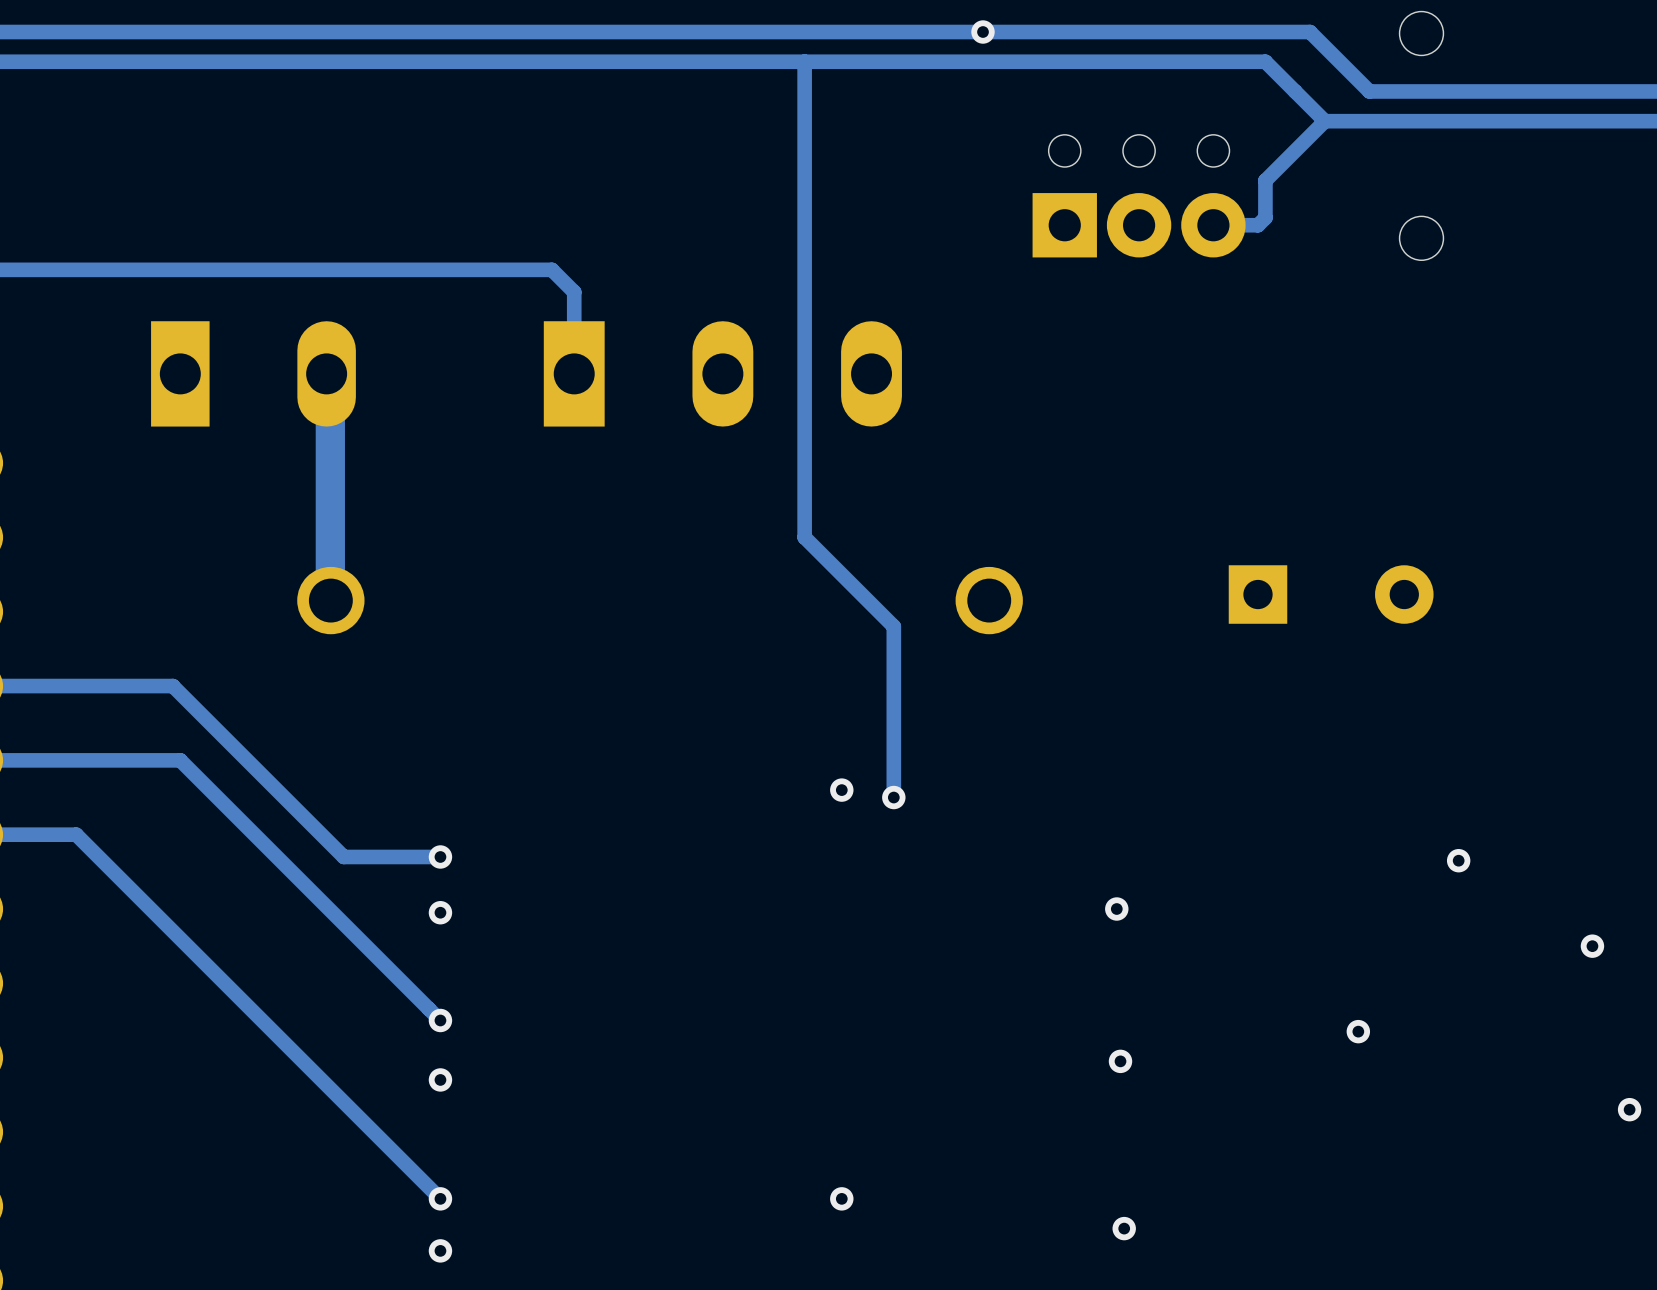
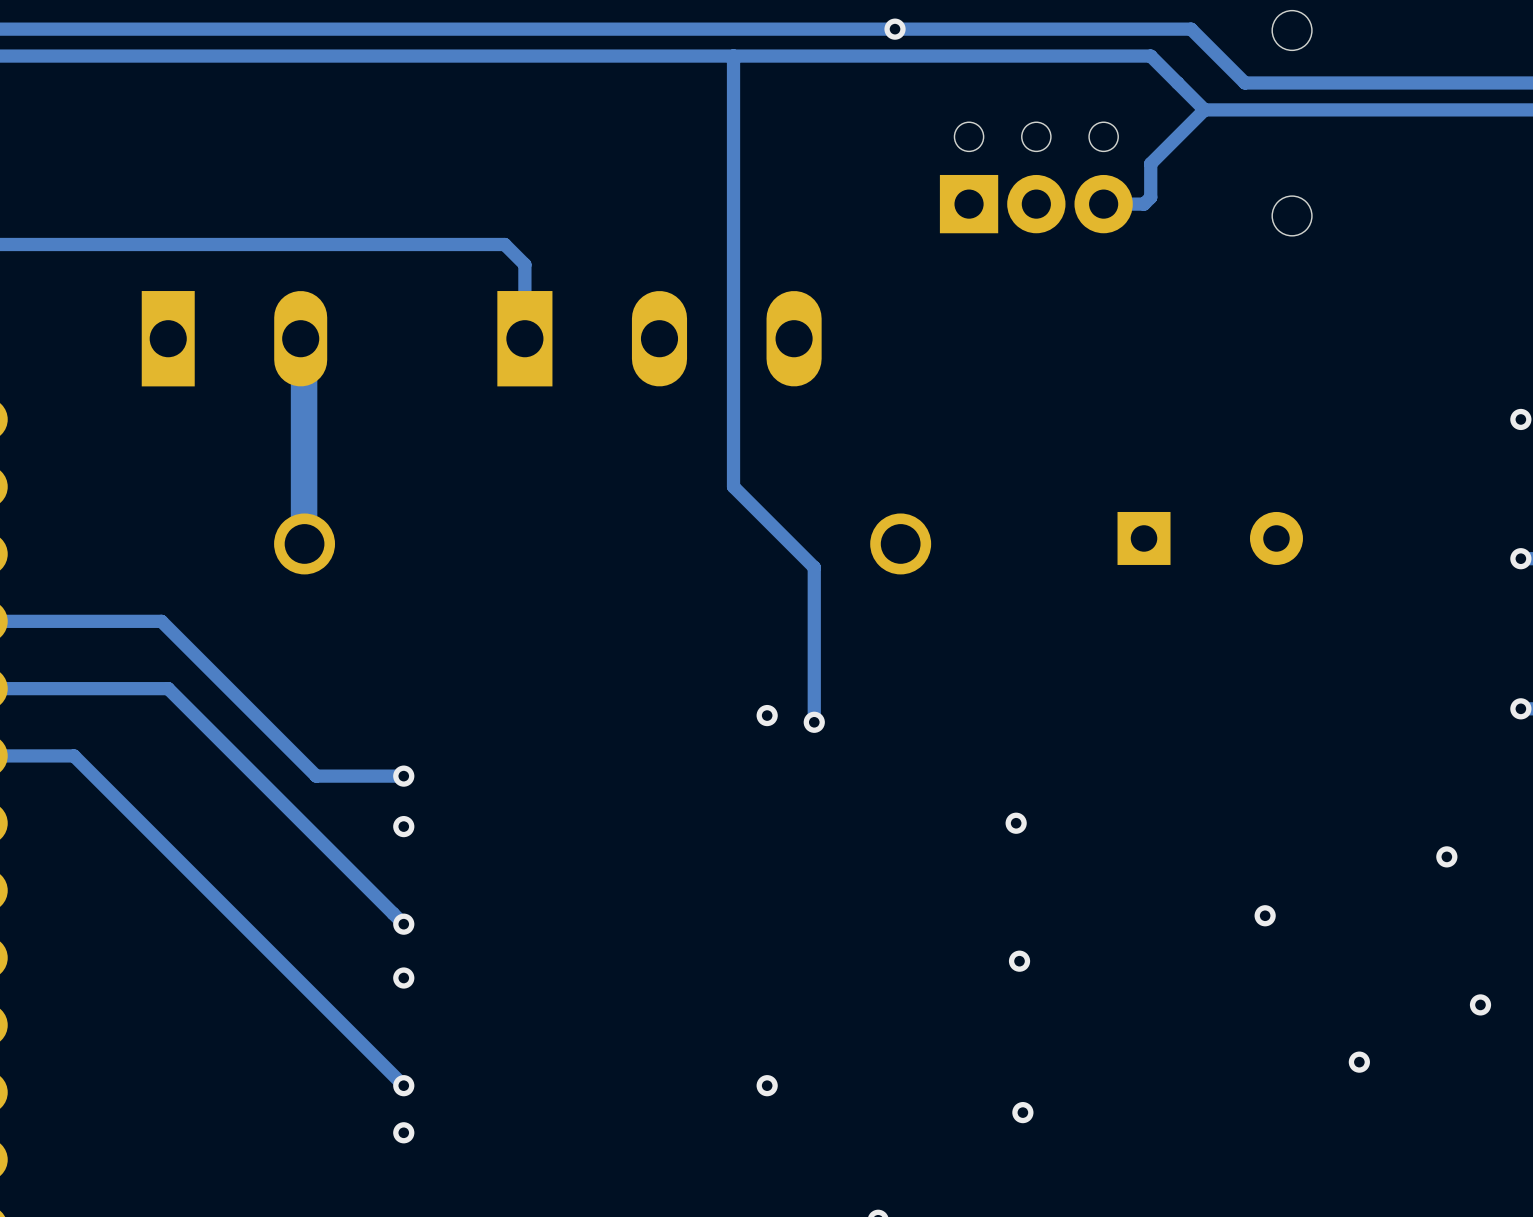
via: (1458, 860) -> none
via position: (1358, 1031) -> (1265, 915)
via: none -> (1359, 1062)

